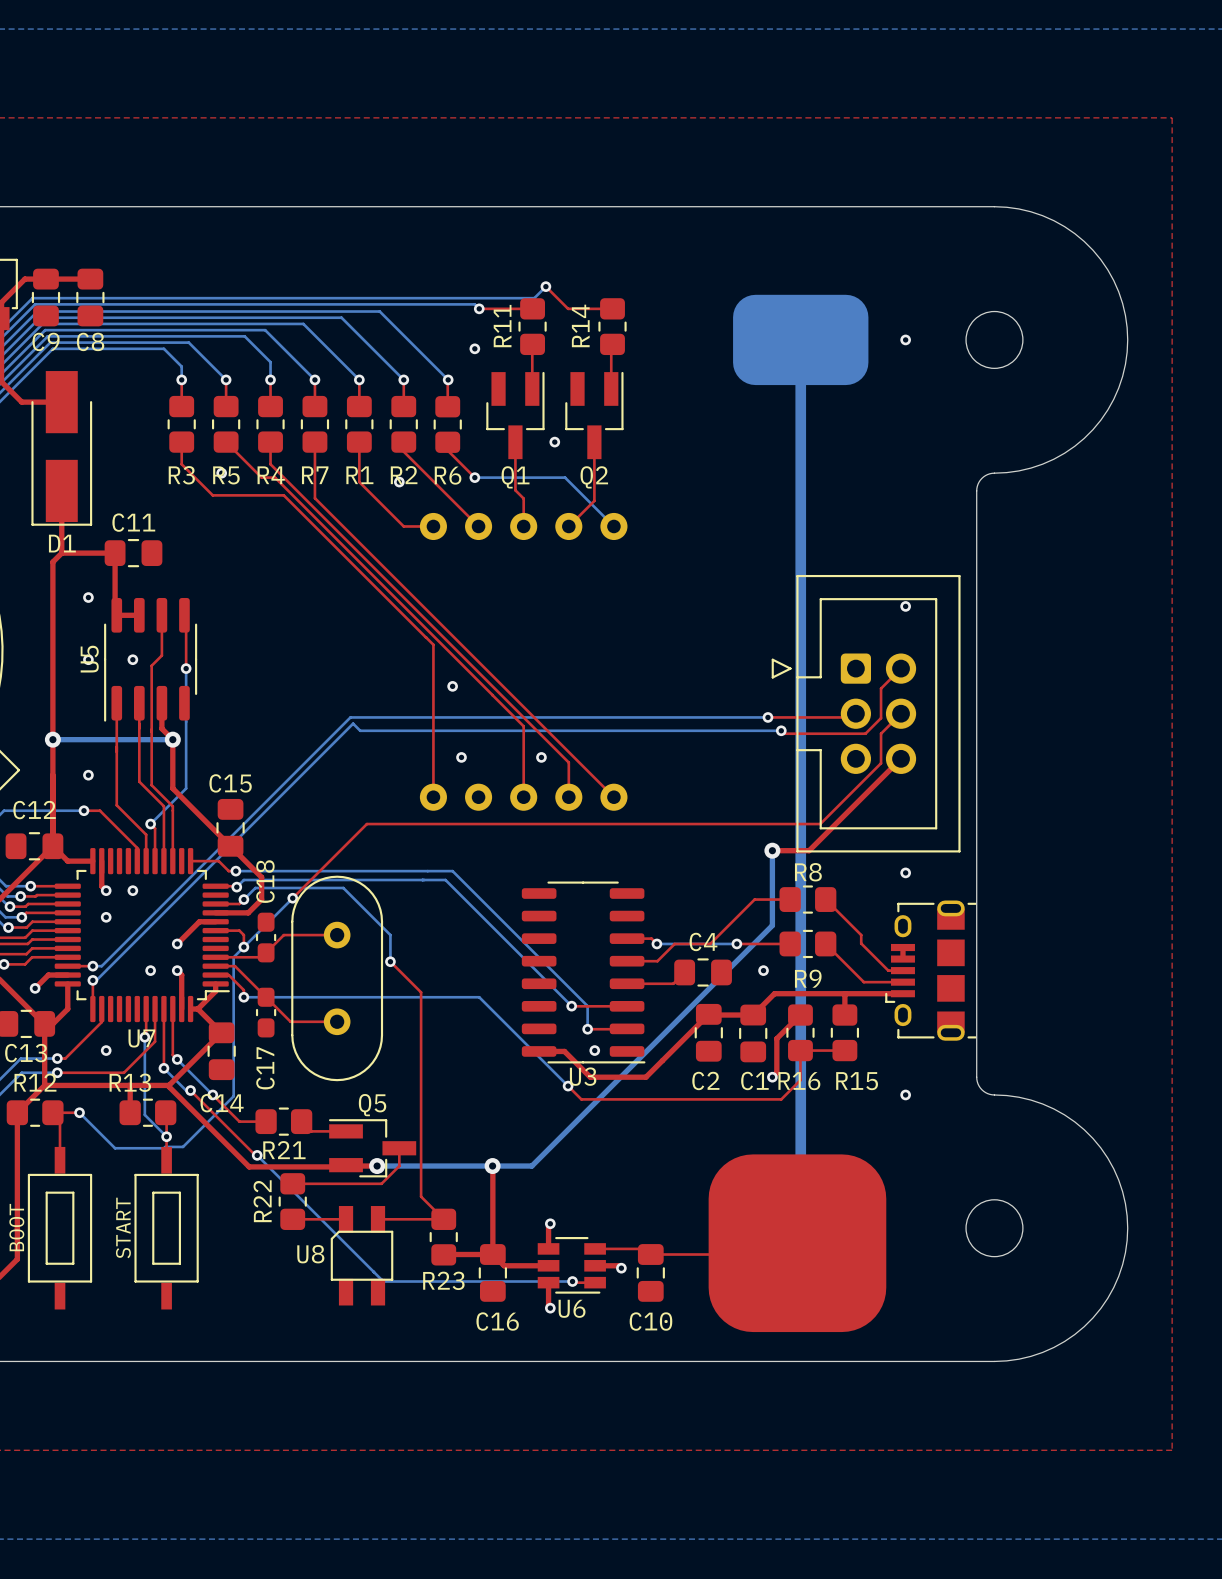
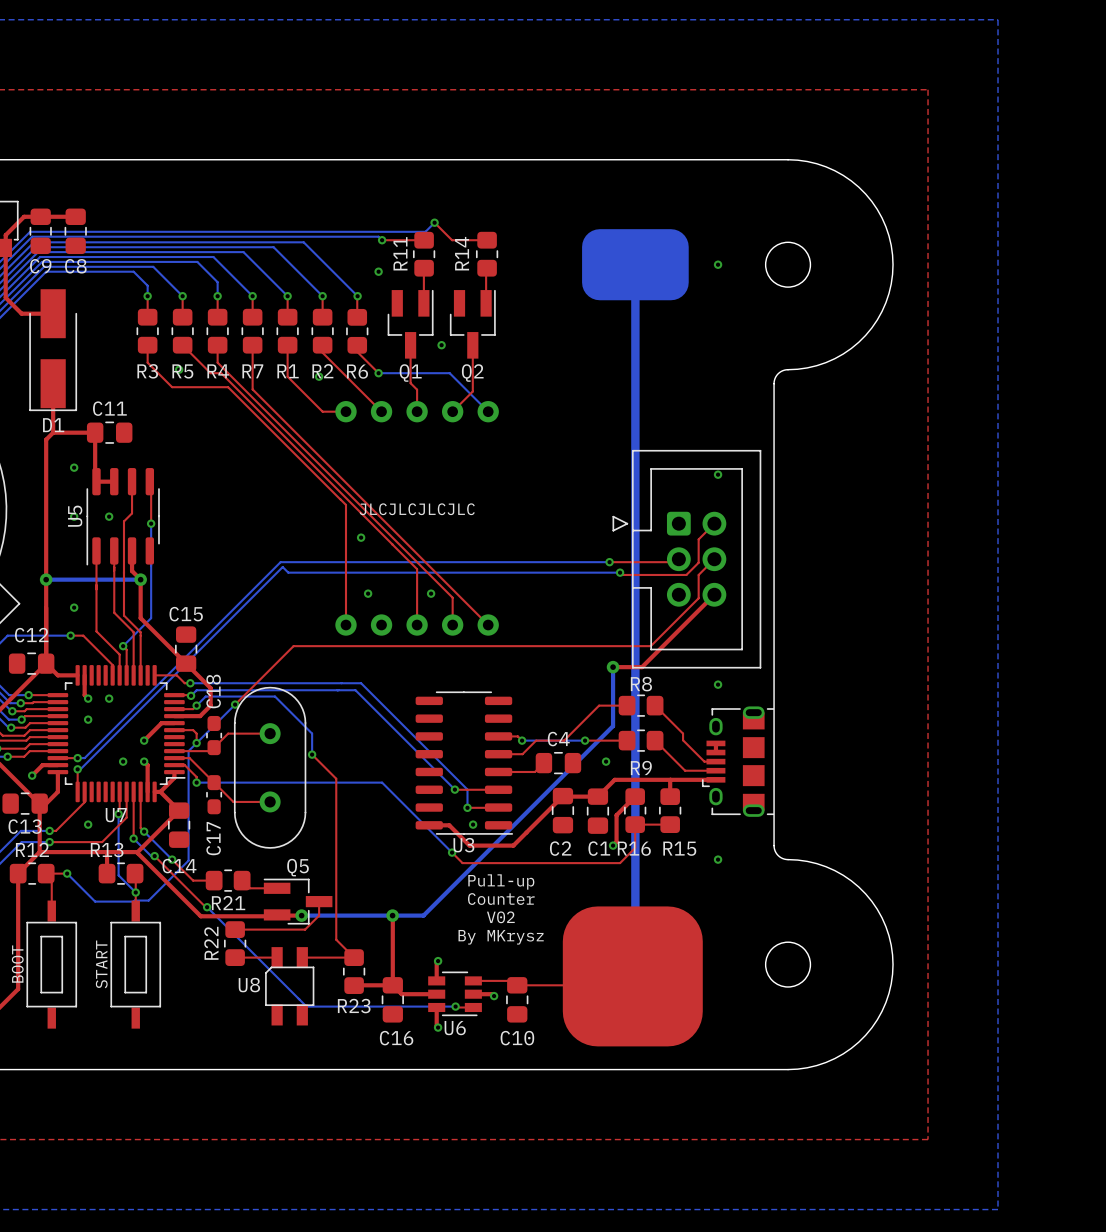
text: none -> JLCJLCJLCJLC (417, 509)
text: none -> Pull-up (501, 881)
text: none -> Counter (501, 899)
text: none -> V02 (500, 917)
text: none -> By MKrysz (501, 937)

